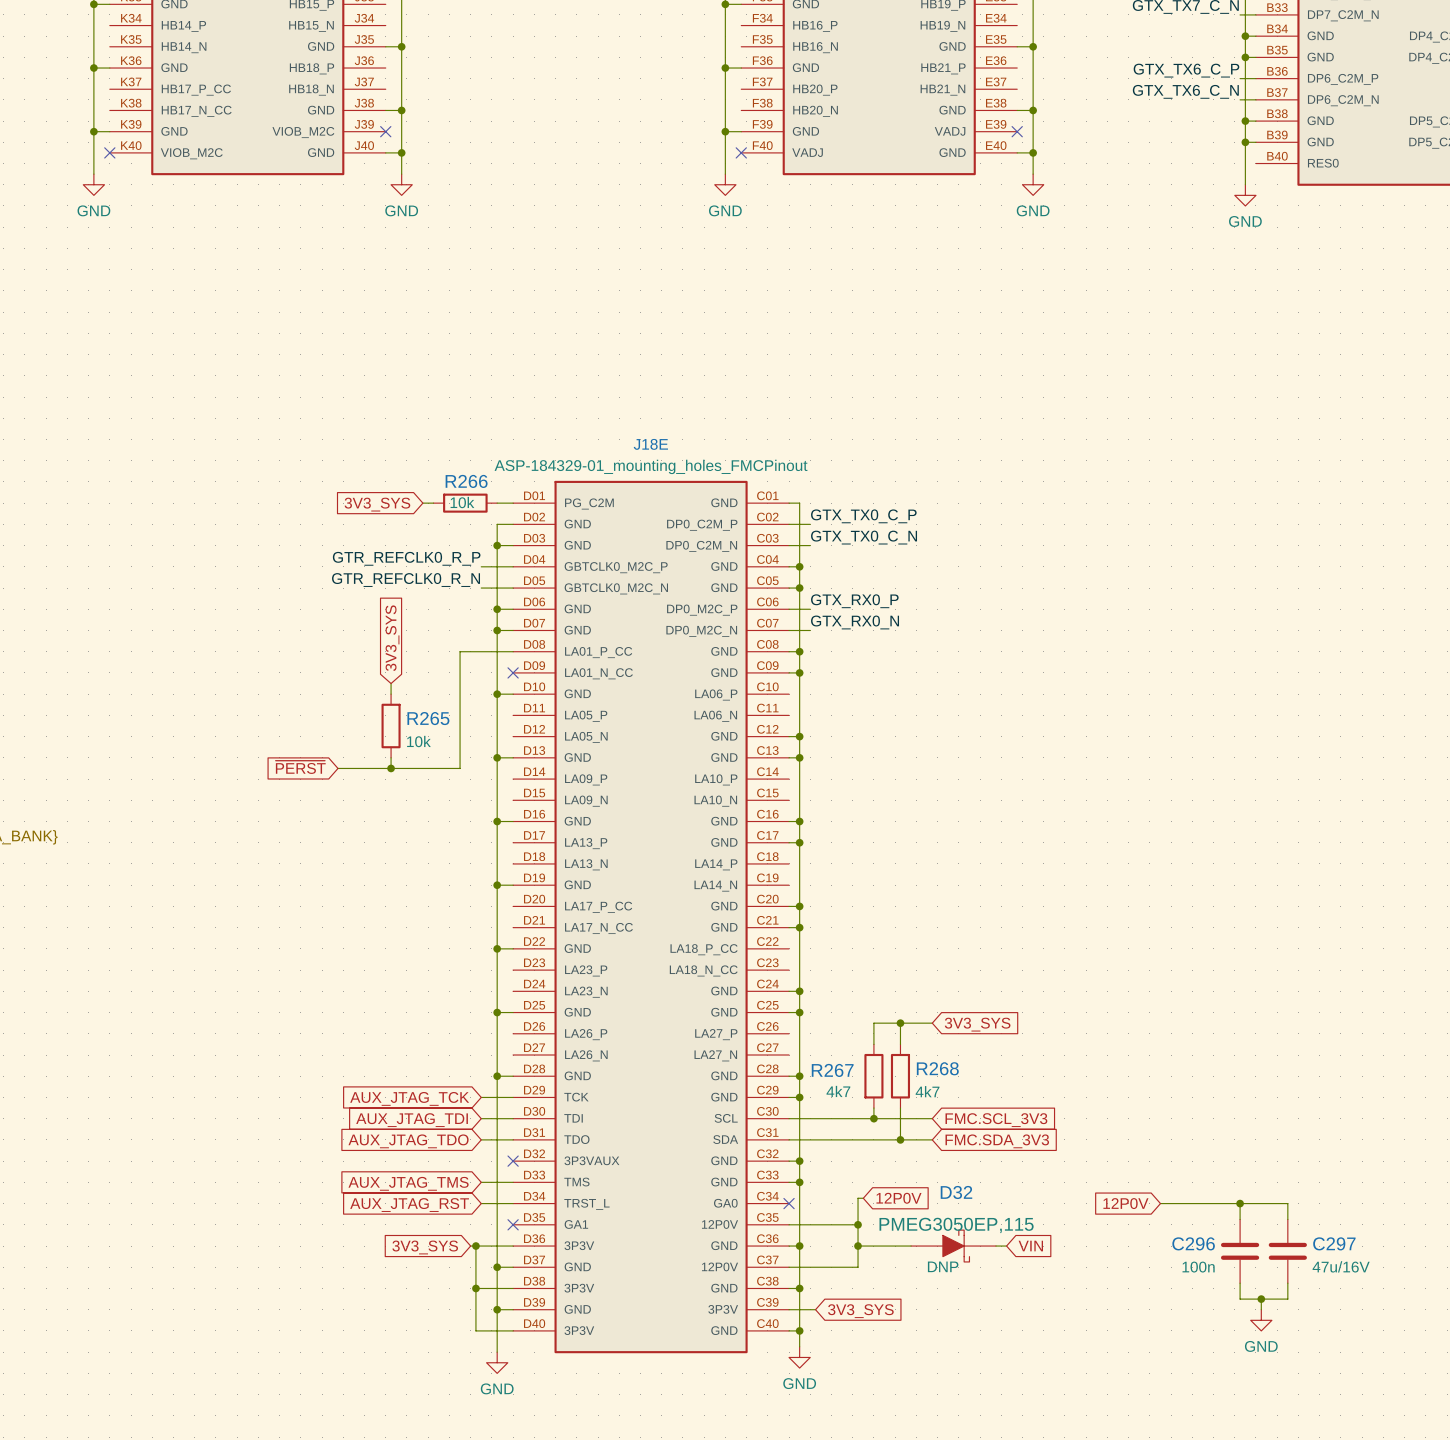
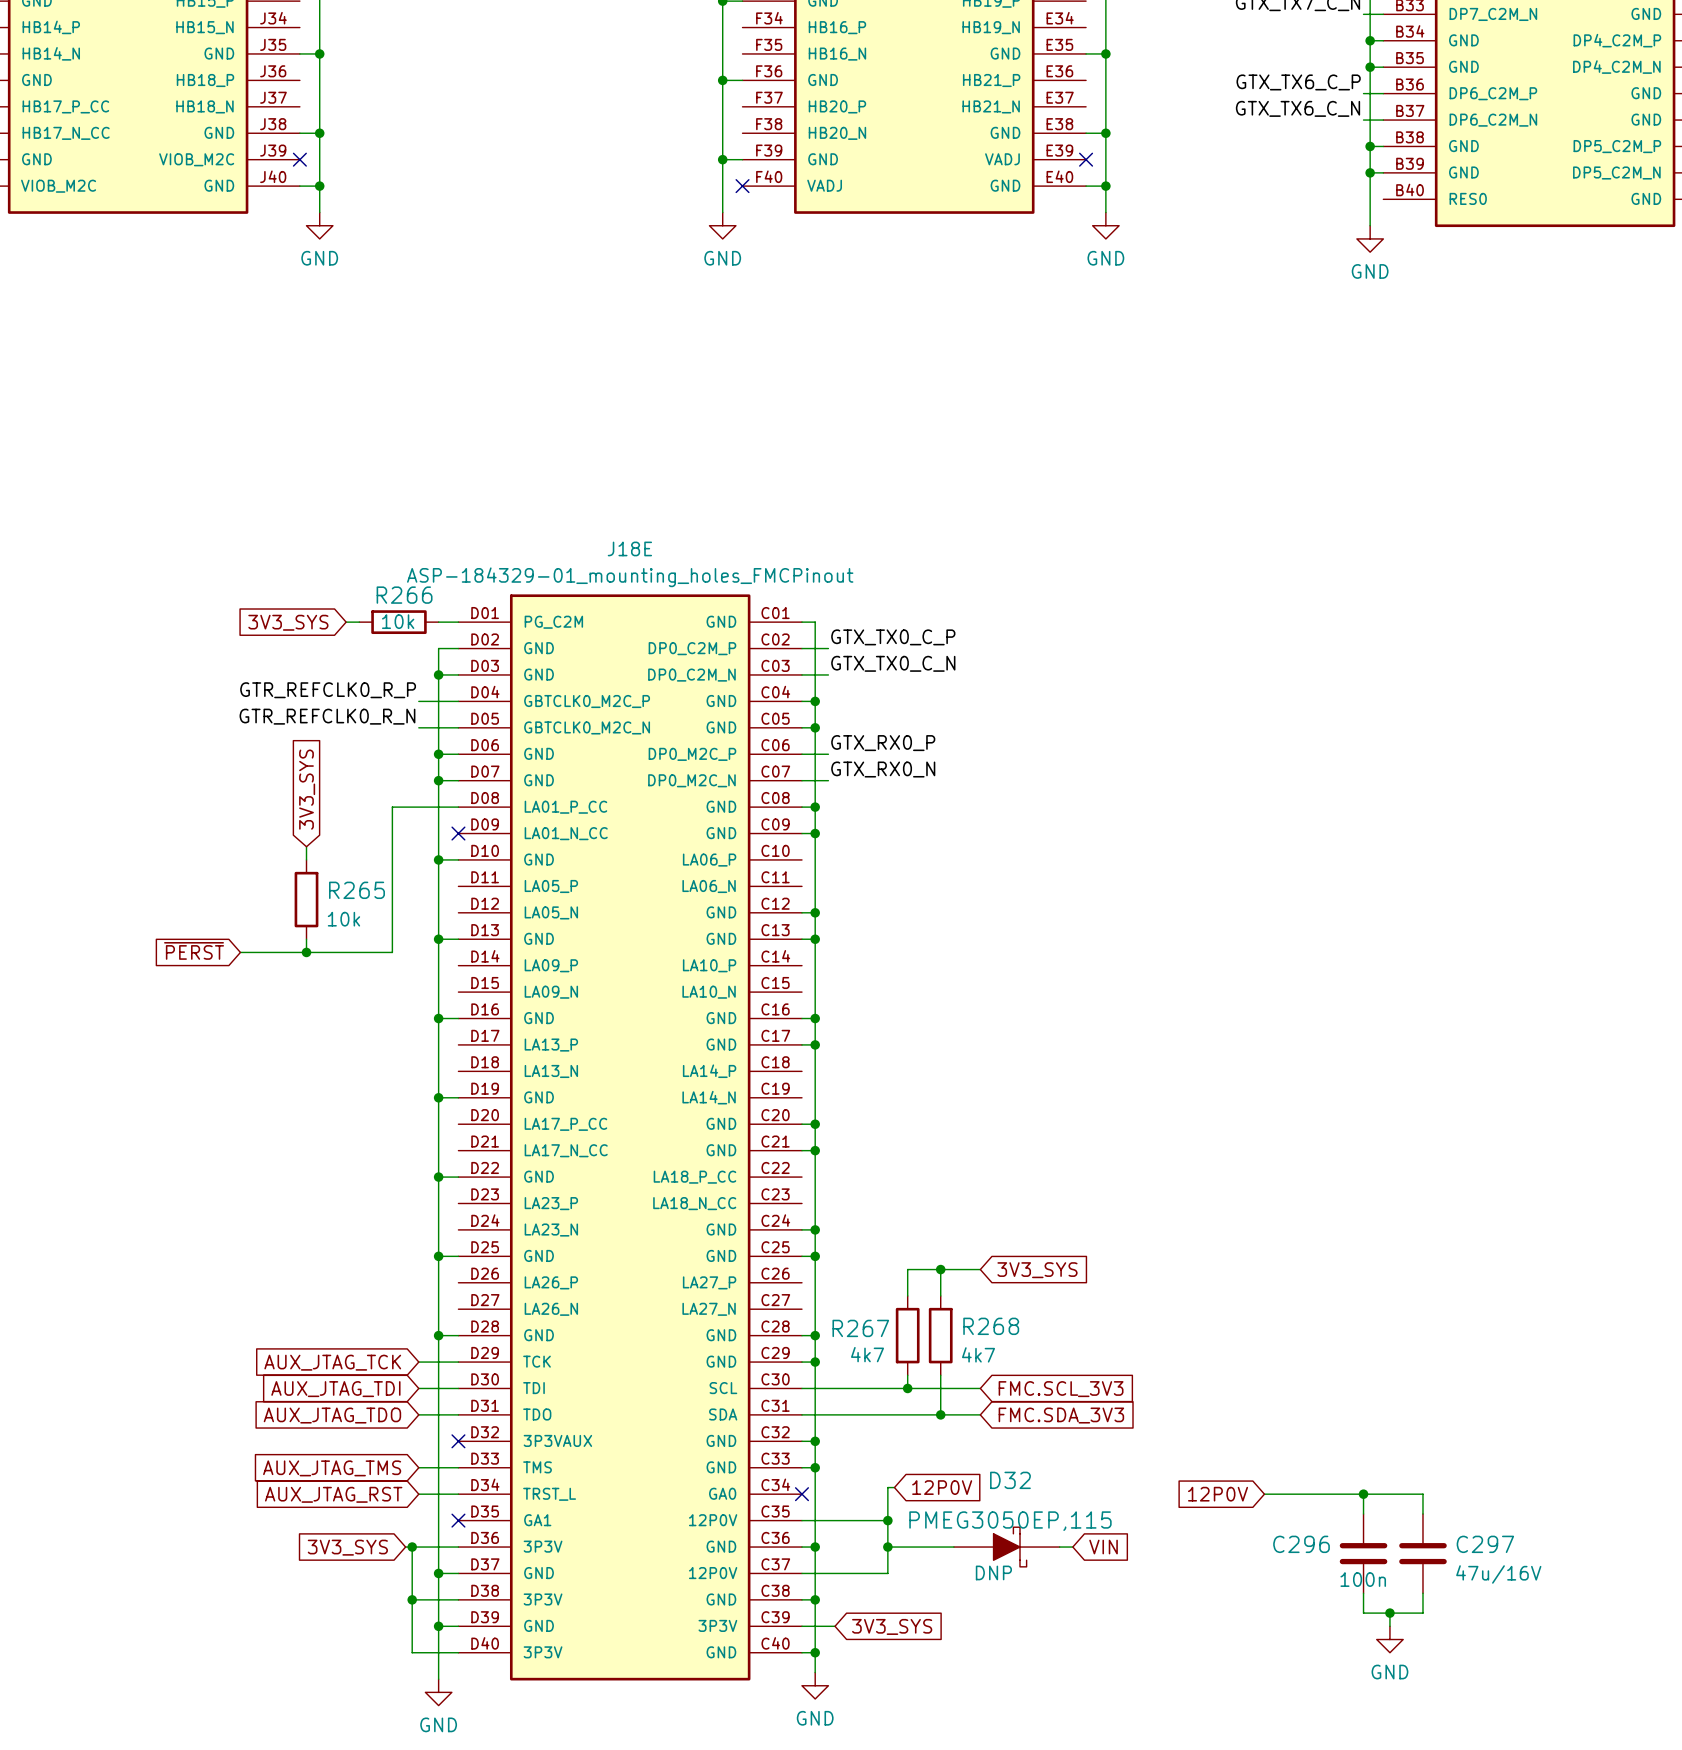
C296 text position: 100n (1198, 1267) -> 100n (1363, 1579)

